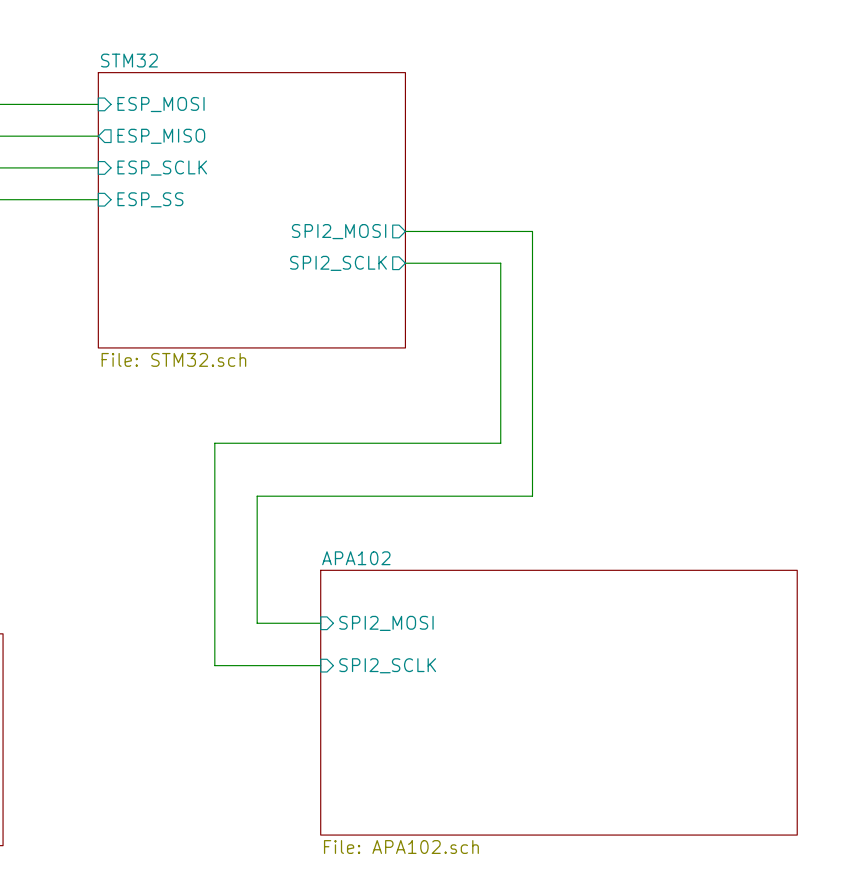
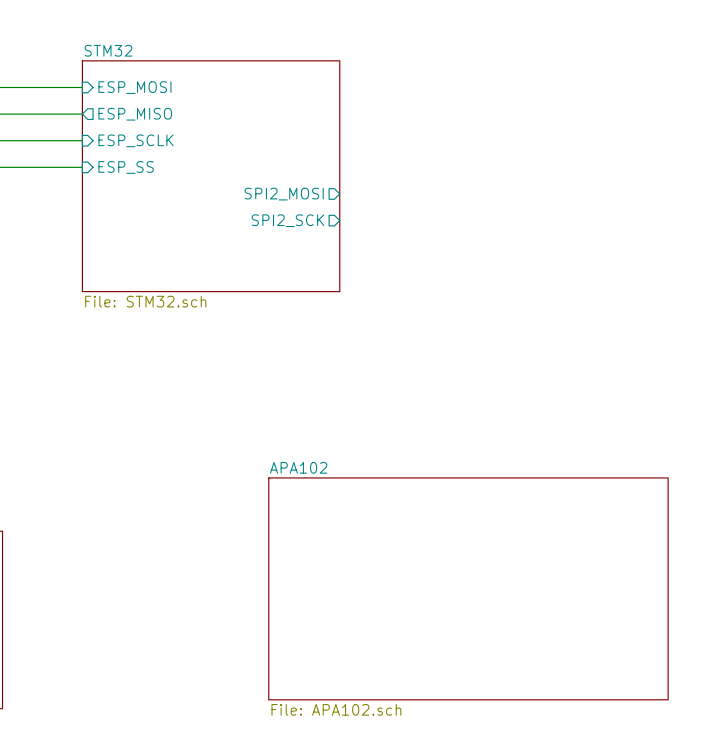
wire: (405, 231) (532, 231) (532, 496) (257, 496) (257, 623) (320, 623) -> none
sheet pin: SPI2_SCLK (338, 263) -> SPI2_SCK (287, 220)
wire: (405, 263) (500, 263) (500, 443) (214, 443) (214, 665) (320, 665) -> none
sheet pin: SPI2_MOSI (386, 623) -> none
sheet pin: SPI2_SCLK (387, 665) -> none

